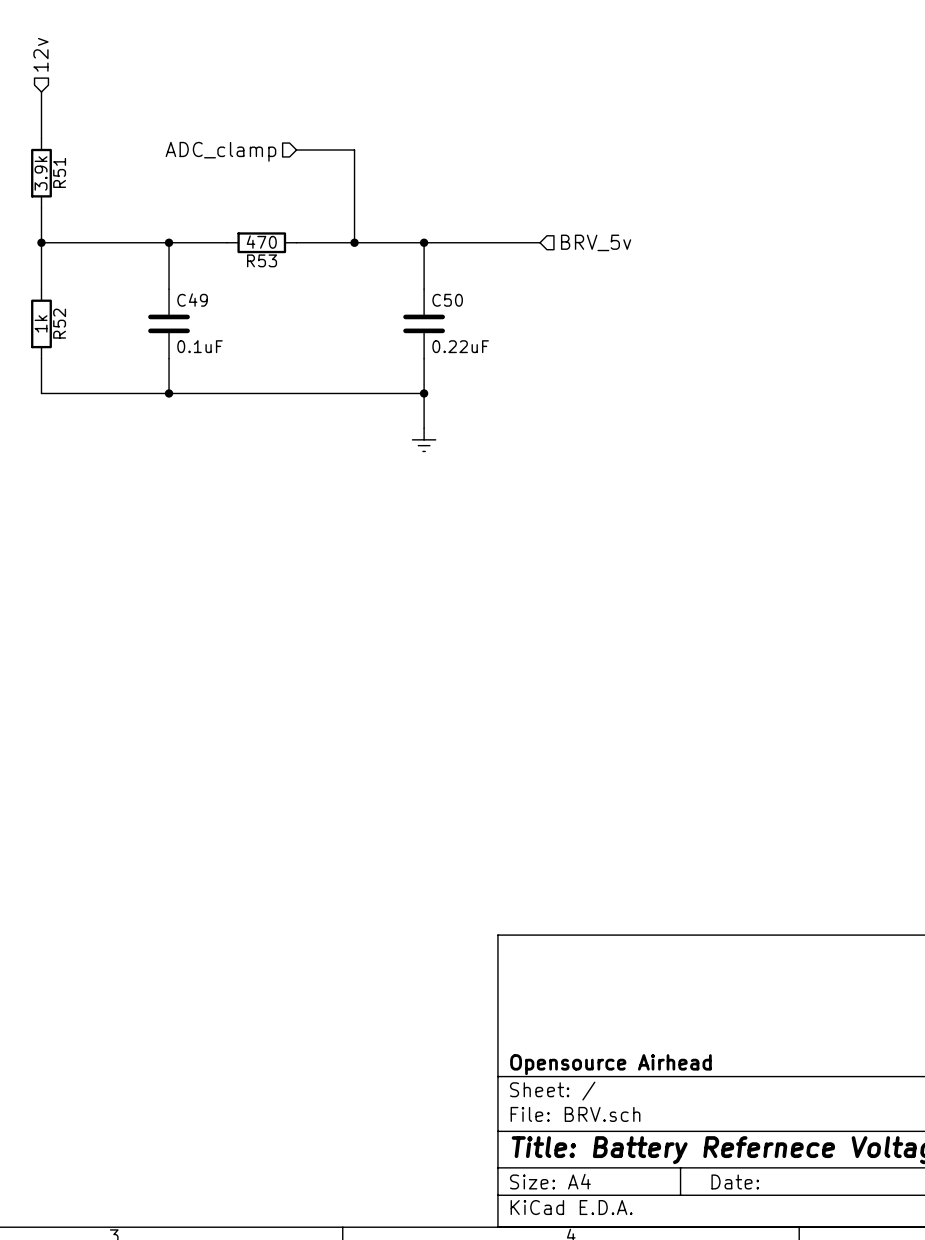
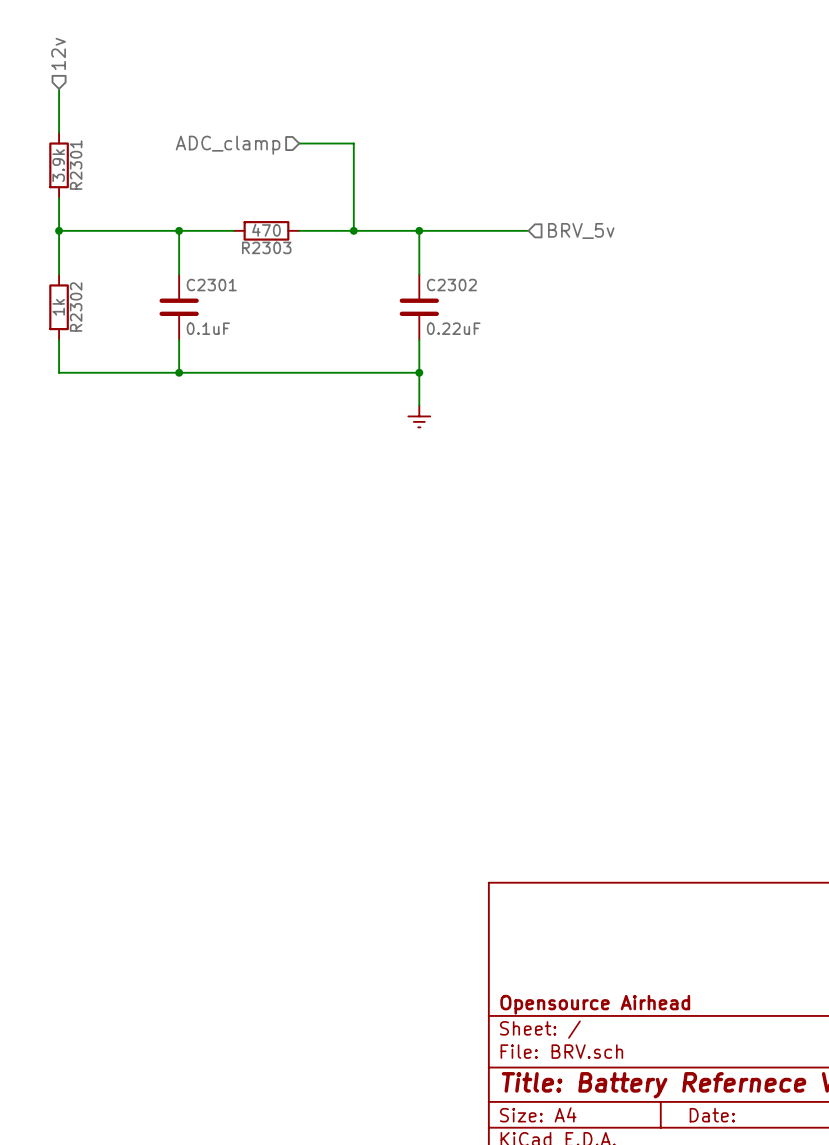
R51 name: R51 (59, 172) -> R2301 (76, 165)
R53 name: R53 (262, 260) -> R2303 (266, 247)
C49 name: C49 (192, 300) -> C2301 (211, 285)
C50 name: C50 (447, 300) -> C2302 (451, 285)
R52 name: R52 (59, 323) -> R2302 (76, 307)

